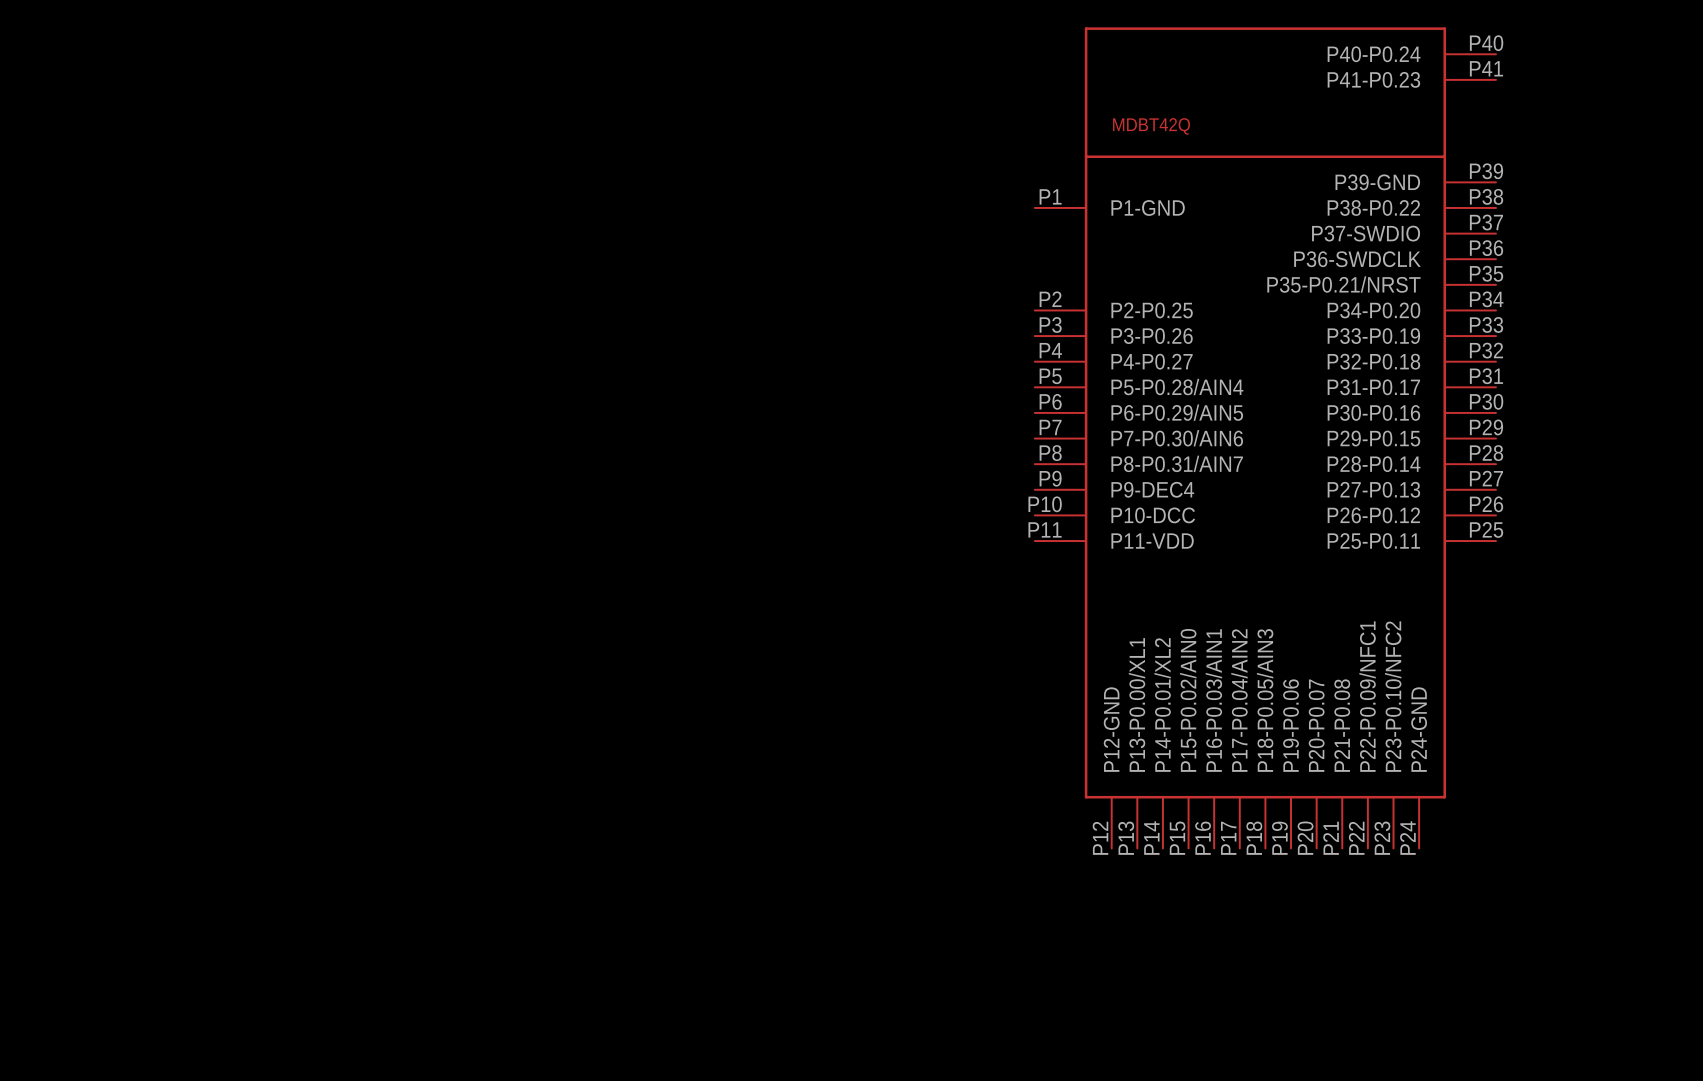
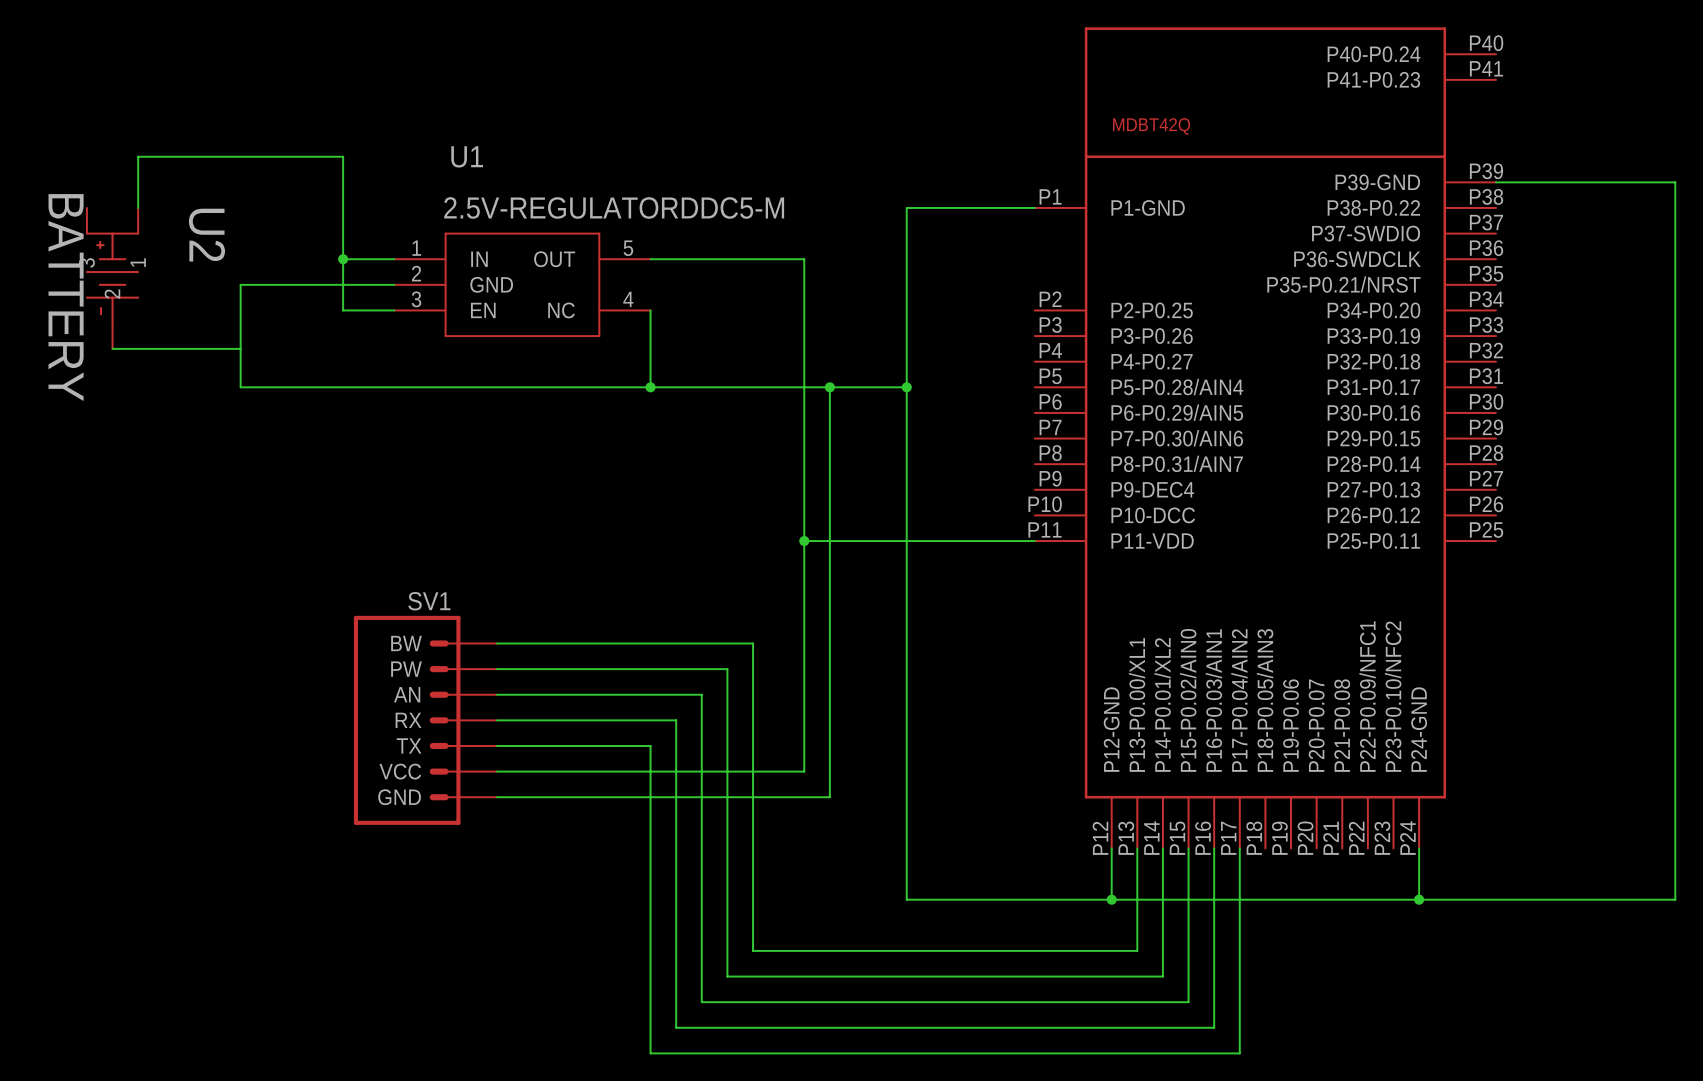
wire: none -> (1495, 182) (1675, 182) (1675, 899) (906, 899) (906, 207) (1034, 207)
wire: none -> (138, 207) (138, 156) (343, 156) (343, 310) (394, 310)
wire: none -> (343, 259) (394, 259)
junction: none -> (343, 259)
wire: none -> (650, 259) (804, 259) (804, 771) (496, 771)
U2: none -> BATTERY (112, 278)
wire: none -> (394, 284) (240, 284) (240, 387) (906, 387)
U1: none -> 2.5V-REGULATORDDC5-M (522, 284)
wire: none -> (650, 310) (650, 387)
wire: none -> (112, 348) (240, 348)
junction: none -> (650, 387)
wire: none -> (829, 387) (829, 797) (496, 797)
junction: none -> (829, 387)
junction: none -> (906, 387)
wire: none -> (804, 541) (1034, 541)
junction: none -> (804, 541)
wire: none -> (496, 643) (753, 643) (753, 950) (1137, 950) (1137, 848)
wire: none -> (496, 669) (727, 669) (727, 976) (1162, 976) (1162, 848)
wire: none -> (496, 694) (701, 694) (701, 1002) (1188, 1002) (1188, 848)
SV1: none -> (425, 720)
wire: none -> (496, 720) (676, 720) (676, 1027) (1214, 1027) (1214, 848)
wire: none -> (496, 745) (650, 745) (650, 1053) (1239, 1053) (1239, 848)
wire: none -> (1111, 848) (1111, 899)
wire: none -> (1419, 848) (1419, 899)
junction: none -> (1111, 899)
junction: none -> (1419, 899)

